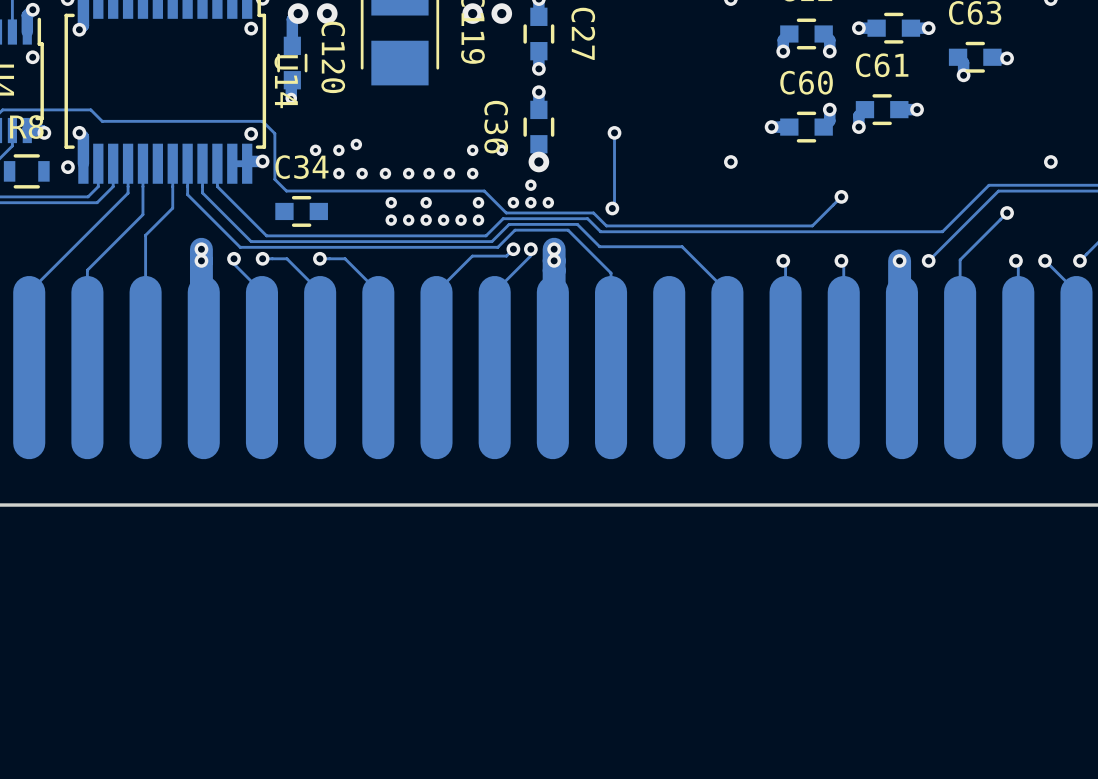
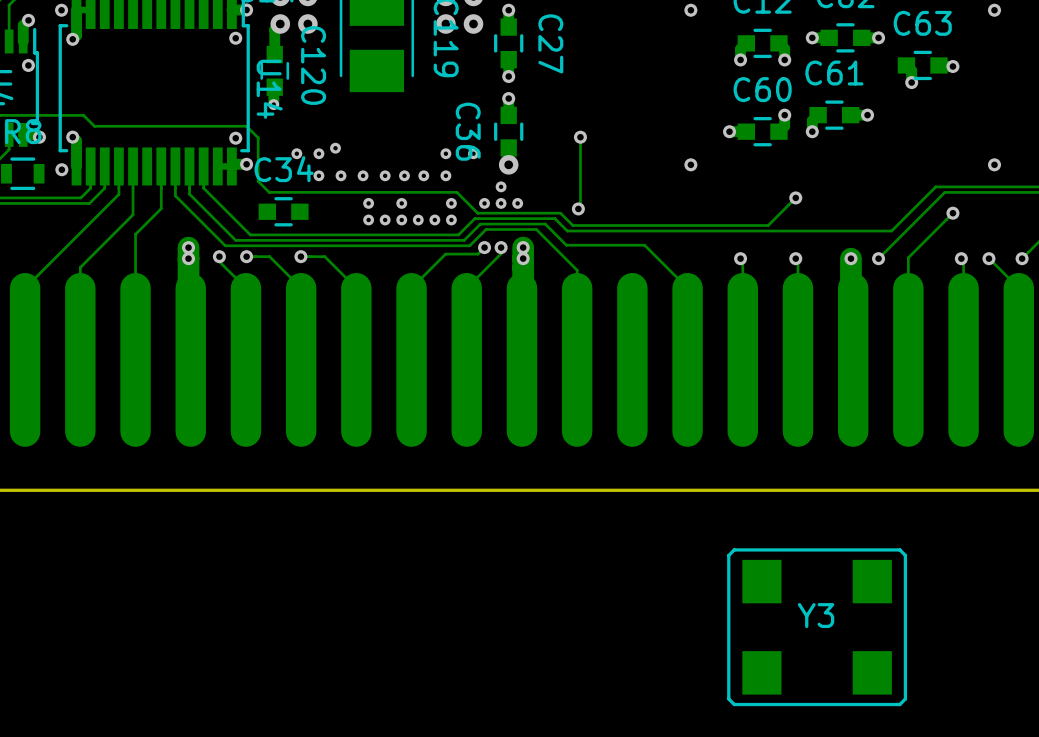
Y3: none -> (817, 627)

